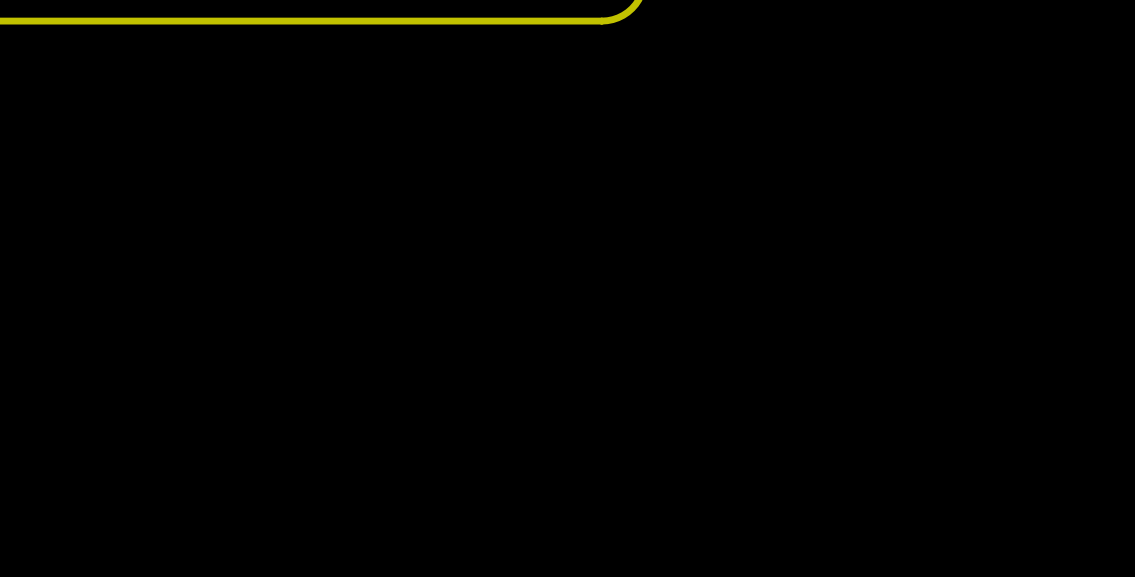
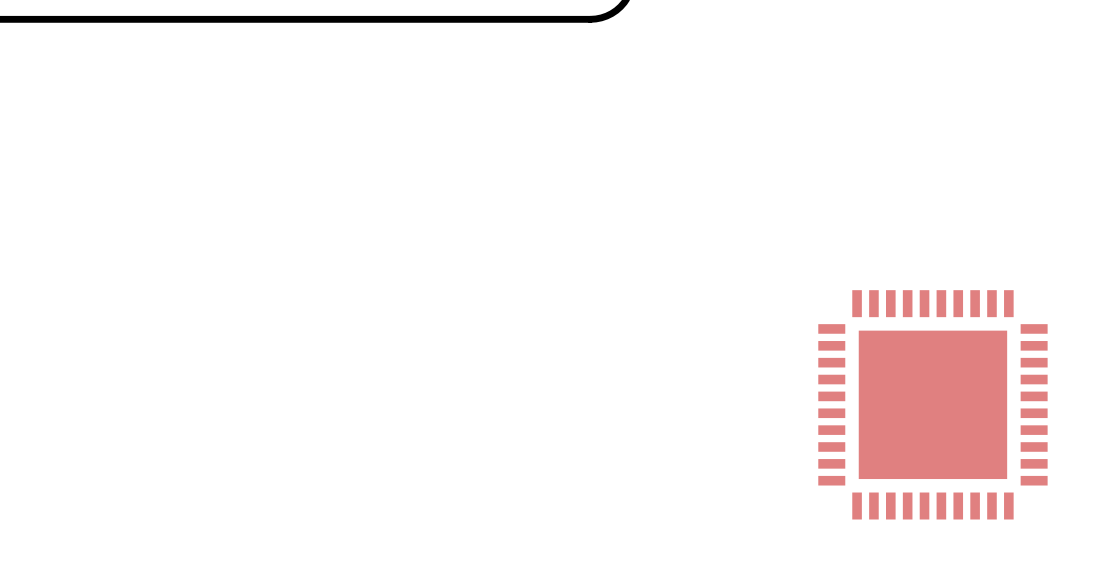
part: none -> (932, 404)

